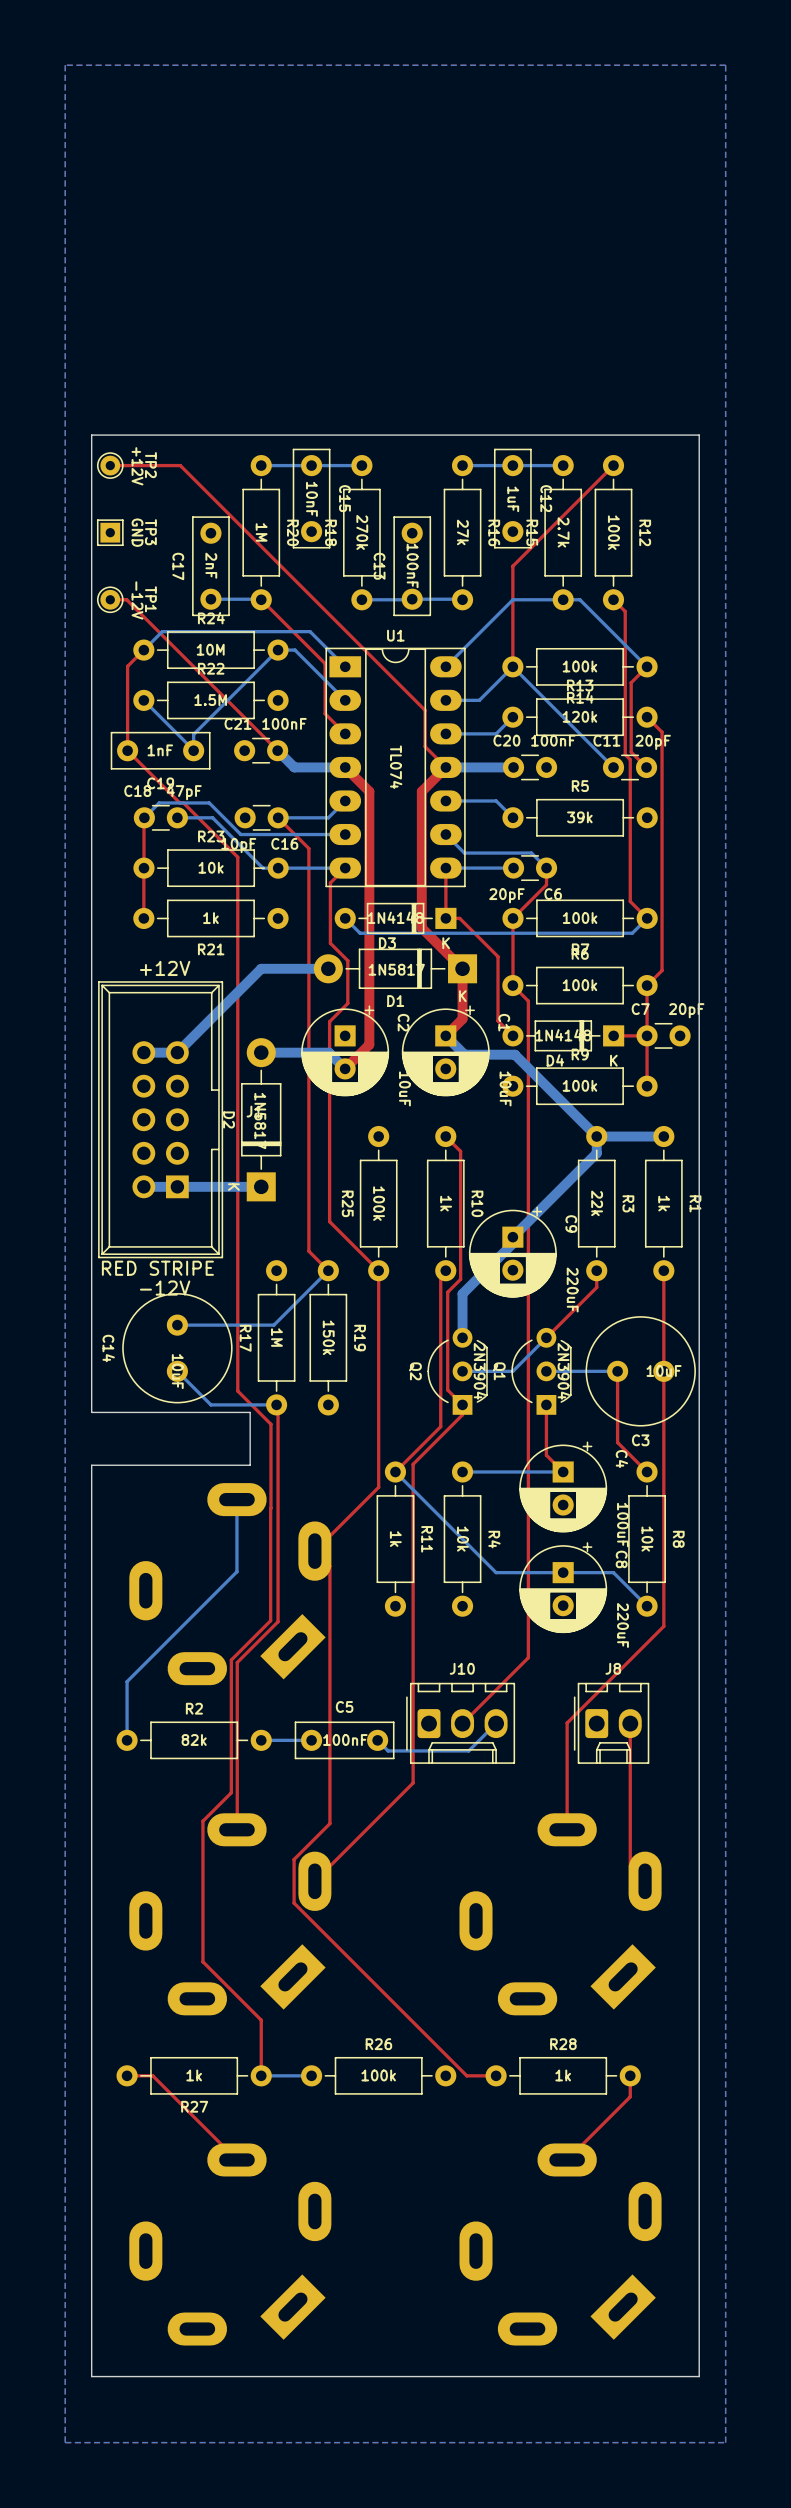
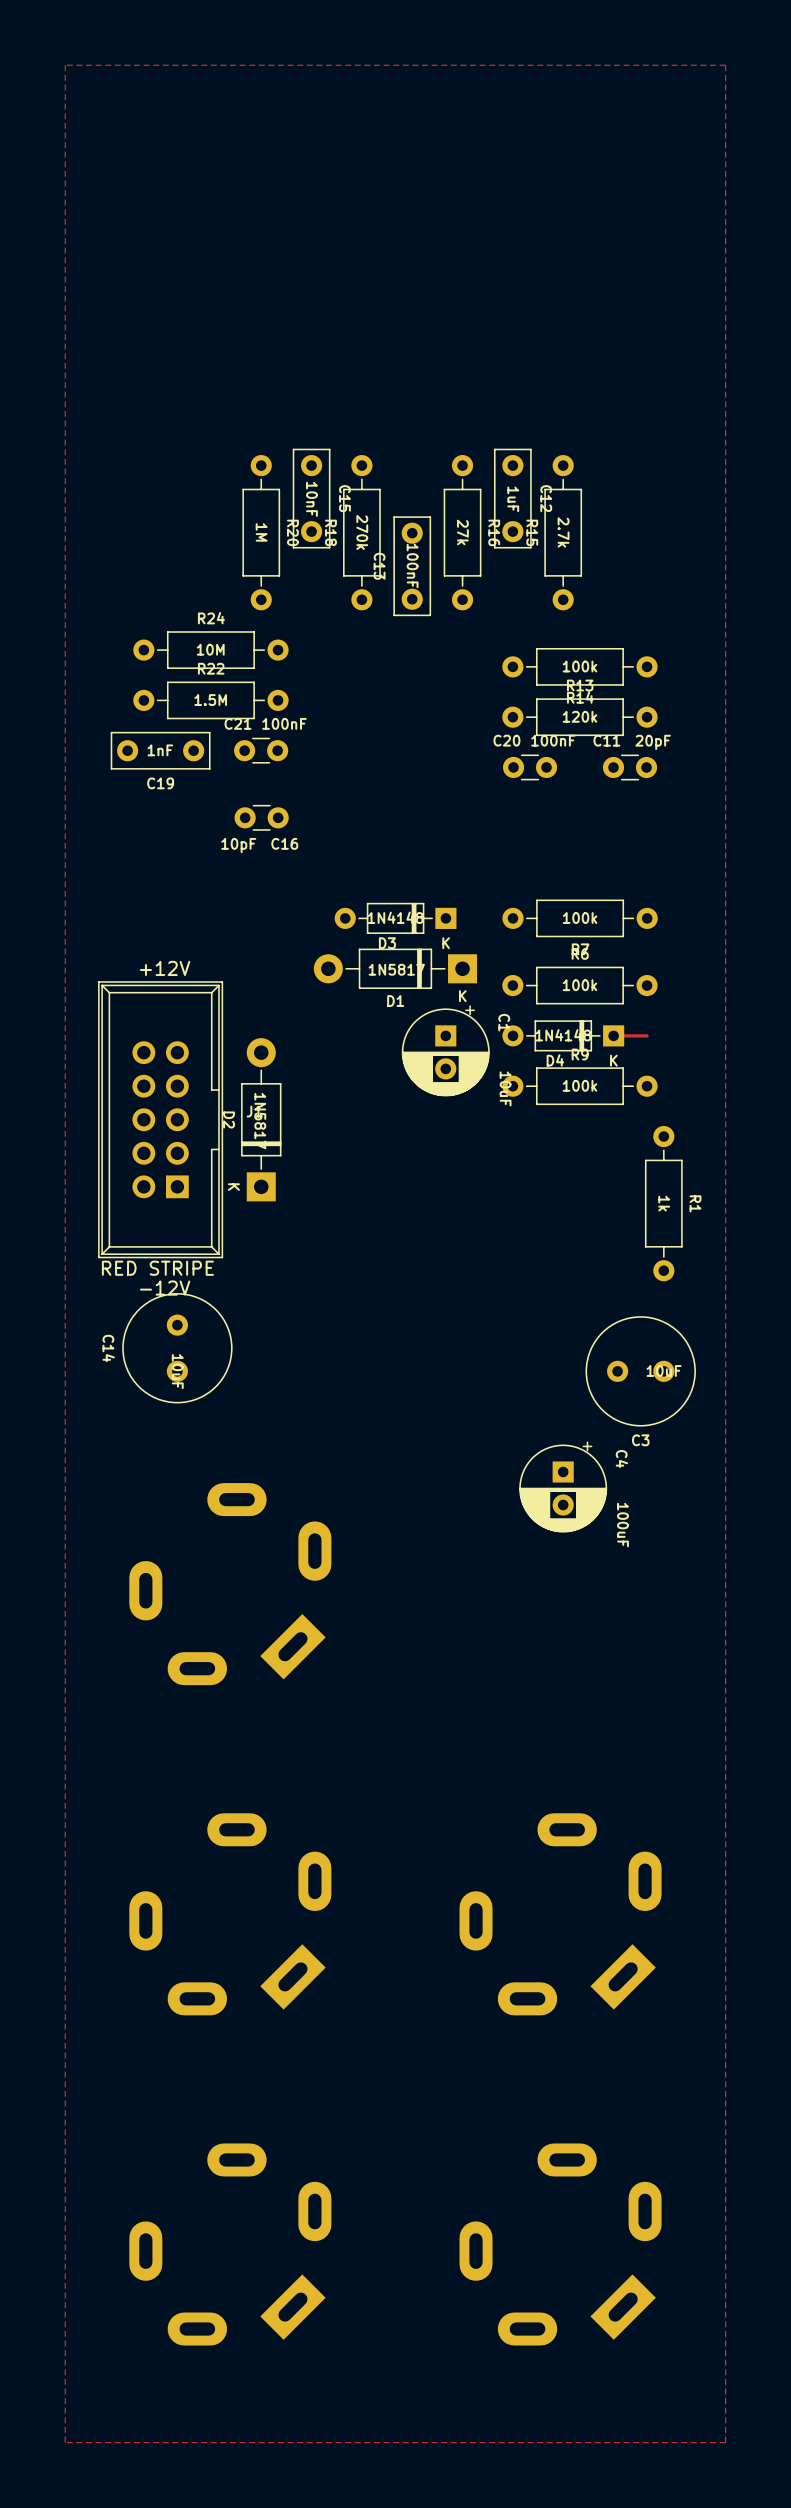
bottom zone outline: (725, 65) (725, 2442) (65, 2442) (65, 65) (725, 65) -> none
board edge: (699, 435) (91, 435) (91, 1412) (250, 1412) (250, 1465) (91, 1465) (91, 2376) (699, 2376) (699, 435) -> none
top track: (110, 465) (180, 465) (425, 710) (425, 746) (445, 767) (421, 791) (421, 928) (462, 968) (462, 1019) (445, 1035) -> none
TP2: +12V (110, 465) -> none
bottom track: (361, 465) (261, 465) -> none
bottom track: (563, 465) (462, 465) -> none
top track: (613, 465) (512, 566) (512, 666) -> none
TP3: GND (110, 532) -> none
R12: 100k (613, 532) -> none
C17: 2nF (210, 566) -> none
top track: (110, 599) (126, 599) (277, 750) -> none
TP1: -12V (110, 599) -> none
bottom track: (210, 599) (261, 599) -> none
top track: (261, 599) (325, 663) (325, 713) (345, 733) -> none
bottom track: (462, 599) (361, 599) -> none
top track: (613, 599) (625, 611) (625, 754) (630, 759) (630, 901) (647, 918) -> none
top track: (143, 650) (127, 666) (127, 750) (237, 857) (237, 1391) (270, 1424) (270, 1620) (231, 1660) (231, 1792) (202, 1821) (202, 1961) (261, 2020) (261, 2075) -> none
bottom track: (143, 650) (162, 631) (310, 631) (345, 666) -> none
top track: (647, 666) (631, 682) (631, 752) (646, 767) -> none
bottom track: (647, 666) (579, 599) (512, 599) (445, 666) -> none
bottom track: (143, 700) (193, 750) -> none
bottom track: (345, 700) (295, 650) (278, 650) (193, 734) (193, 750) -> none
bottom track: (445, 700) (479, 700) (512, 666) (613, 767) -> none
bottom track: (512, 717) (496, 733) (445, 733) -> none
top track: (647, 717) (662, 732) (662, 970) (647, 985) (647, 1086) -> none
bottom track: (277, 750) (294, 767) (345, 767) -> none
top track: (345, 767) (369, 791) (369, 1044) (345, 1068) -> none
U1: TL074 (395, 767) -> none
bottom track: (513, 767) (445, 767) -> none
bottom track: (345, 800) (328, 817) (278, 817) -> none
bottom track: (445, 800) (496, 800) (513, 817) -> none
top track: (144, 817) (143, 868) -> none
bottom track: (144, 817) (159, 802) (209, 802) (240, 834) (345, 834) -> none
C18: 47pF (160, 817) -> none
bottom track: (177, 817) (212, 817) (262, 868) (345, 868) -> none
top track: (278, 817) (308, 848) (308, 1251) (328, 1270) -> none
R5: 39k (580, 817) -> none
bottom track: (445, 834) (464, 853) (531, 853) (546, 868) -> none
top track: (143, 868) (143, 918) -> none
R23: 10k (211, 868) -> none
top track: (345, 868) (330, 882) (330, 943) (347, 960) (347, 1003) (329, 1021) (329, 1221) (378, 1270) (378, 1487) (314, 1551) (329, 1566) (329, 1823) (294, 1859) (294, 1903) (466, 2075) (496, 2075) -> none
top track: (445, 868) (445, 918) (459, 918) (498, 956) (498, 1020) (513, 1035) -> none
bottom track: (513, 868) (445, 868) -> none
C6: 20pF (530, 868) -> none
top track: (546, 868) (546, 884) (513, 918) (513, 985) -> none
R21: 1k (210, 918) -> none
bottom track: (647, 918) (632, 933) (360, 933) (345, 918) -> none
bottom track: (328, 968) (261, 968) (177, 1052) (143, 1052) -> none
top track: (512, 985) (528, 1001) (528, 1657) (462, 1723) -> none
bottom track: (445, 1035) (464, 1054) (514, 1054) (596, 1136) -> none
C7: 20pF (663, 1035) -> none
C2: 10uF (345, 1050) -> none
bottom track: (261, 1052) (328, 1052) (345, 1068) -> none
top track: (445, 1136) (460, 1151) (460, 1279) (447, 1292) (447, 1390) (462, 1404) (462, 1414) (413, 1464) (413, 1783) (314, 1881) -> none
bottom track: (596, 1136) (596, 1153) (512, 1237) (512, 1243) (462, 1293) (462, 1337) -> none
bottom track: (663, 1136) (596, 1136) -> none
bottom track: (261, 1186) (143, 1186) -> none
R25: 100k (378, 1203) -> none
R10: 1k (445, 1203) -> none
R3: 22k (596, 1203) -> none
C9: 220uF (512, 1252) -> none
bottom track: (328, 1270) (273, 1325) (177, 1325) -> none
top track: (445, 1270) (440, 1275) (440, 1426) (395, 1471) -> none
top track: (596, 1270) (596, 1287) (546, 1337) -> none
top track: (663, 1270) (663, 1626) (567, 1723) (567, 1829) -> none
R17: 1M (276, 1337) -> none
R19: 150k (328, 1337) -> none
bottom track: (546, 1337) (512, 1371) (462, 1371) -> none
bottom track: (177, 1371) (210, 1404) (276, 1404) -> none
Q2: 2N3904 (457, 1371) -> none
Q1: 2N3904 (541, 1371) -> none
top track: (617, 1371) (617, 1442) (647, 1471) -> none
bottom track: (617, 1371) (546, 1371) -> none
top track: (276, 1404) (278, 1621) (237, 1662) (236, 1829) -> none
top track: (546, 1404) (546, 1455) (563, 1471) -> none
bottom track: (395, 1471) (496, 1572) (613, 1572) (647, 1606) -> none
bottom track: (563, 1471) (462, 1471) -> none
bottom track: (236, 1499) (236, 1571) (127, 1681) (127, 1740) -> none
R11: 1k (395, 1539) -> none
R4: 10k (462, 1539) -> none
R8: 10k (647, 1539) -> none
C8: 220uF (563, 1587) -> none
J10: (460, 1723) -> none
bottom track: (496, 1723) (468, 1750) (388, 1750) (377, 1740) -> none
J8: (611, 1723) -> none
top track: (630, 1723) (630, 1866) (645, 1881) -> none
R2: 82k (194, 1740) -> none
bottom track: (311, 1740) (261, 1740) -> none
C5: 100nF (344, 1740) -> none
top track: (127, 2075) (152, 2075) (236, 2159) -> none
R27: 1k (194, 2075) -> none
bottom track: (311, 2075) (261, 2075) -> none
R26: 100k (378, 2075) -> none
R28: 1k (563, 2075) -> none
top track: (630, 2075) (630, 2096) (567, 2159) -> none

